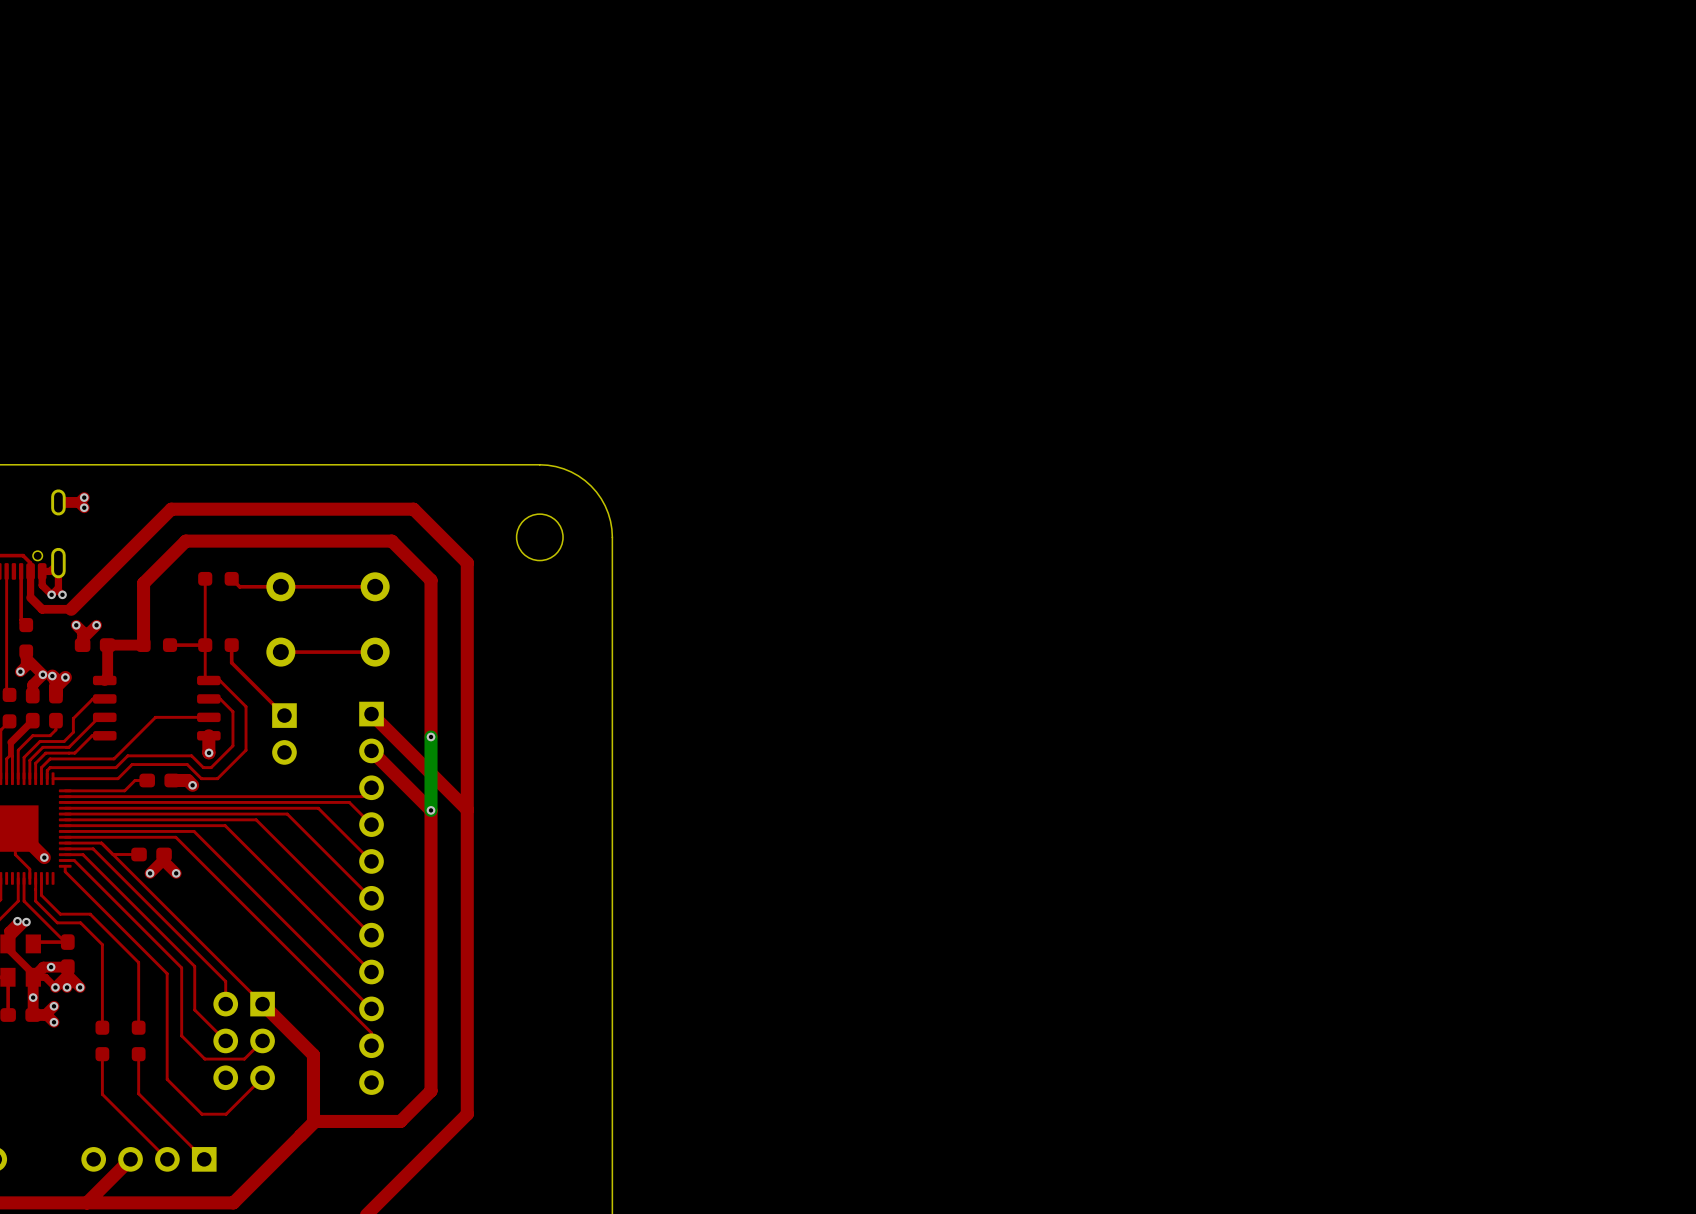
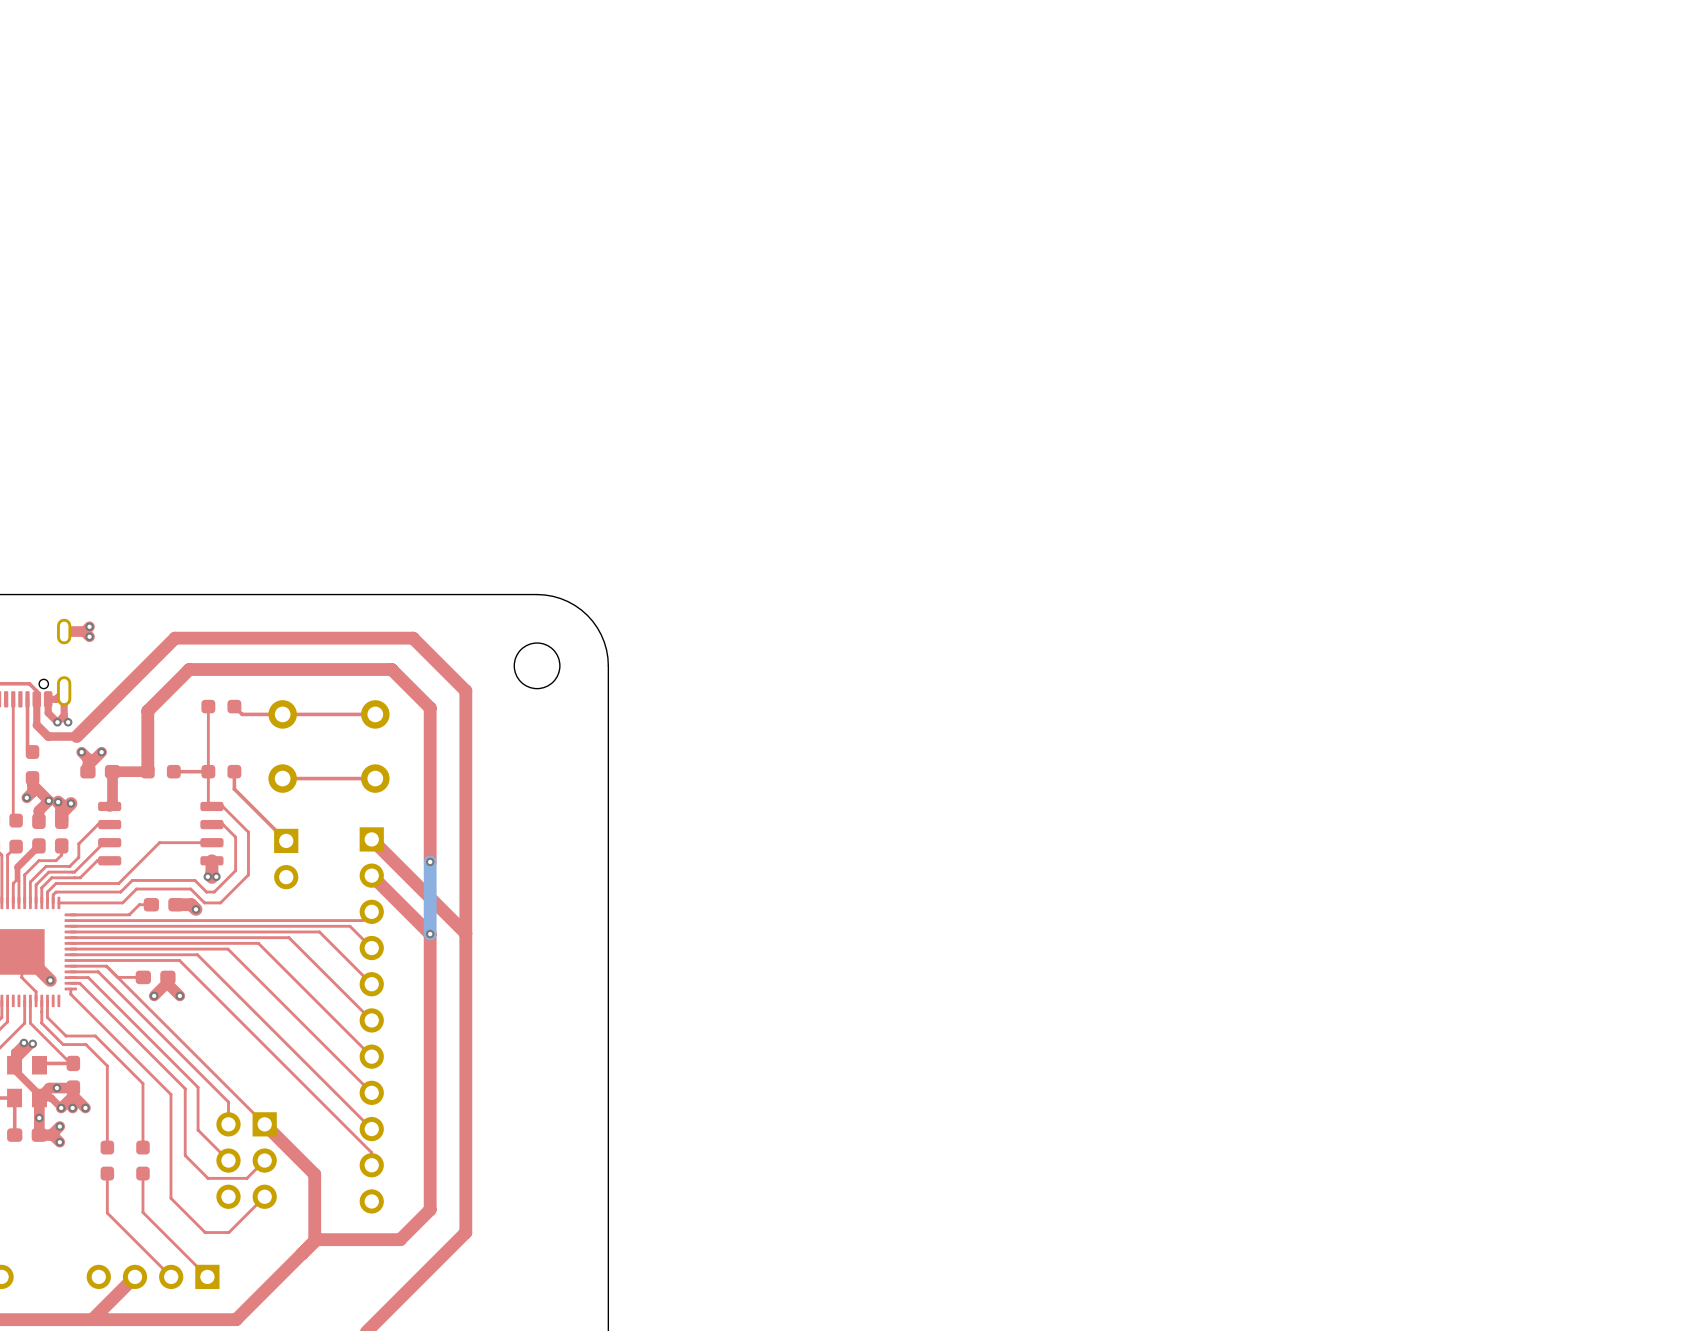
via: none -> (207, 876)
via: (209, 752) -> none
via: none -> (216, 876)

